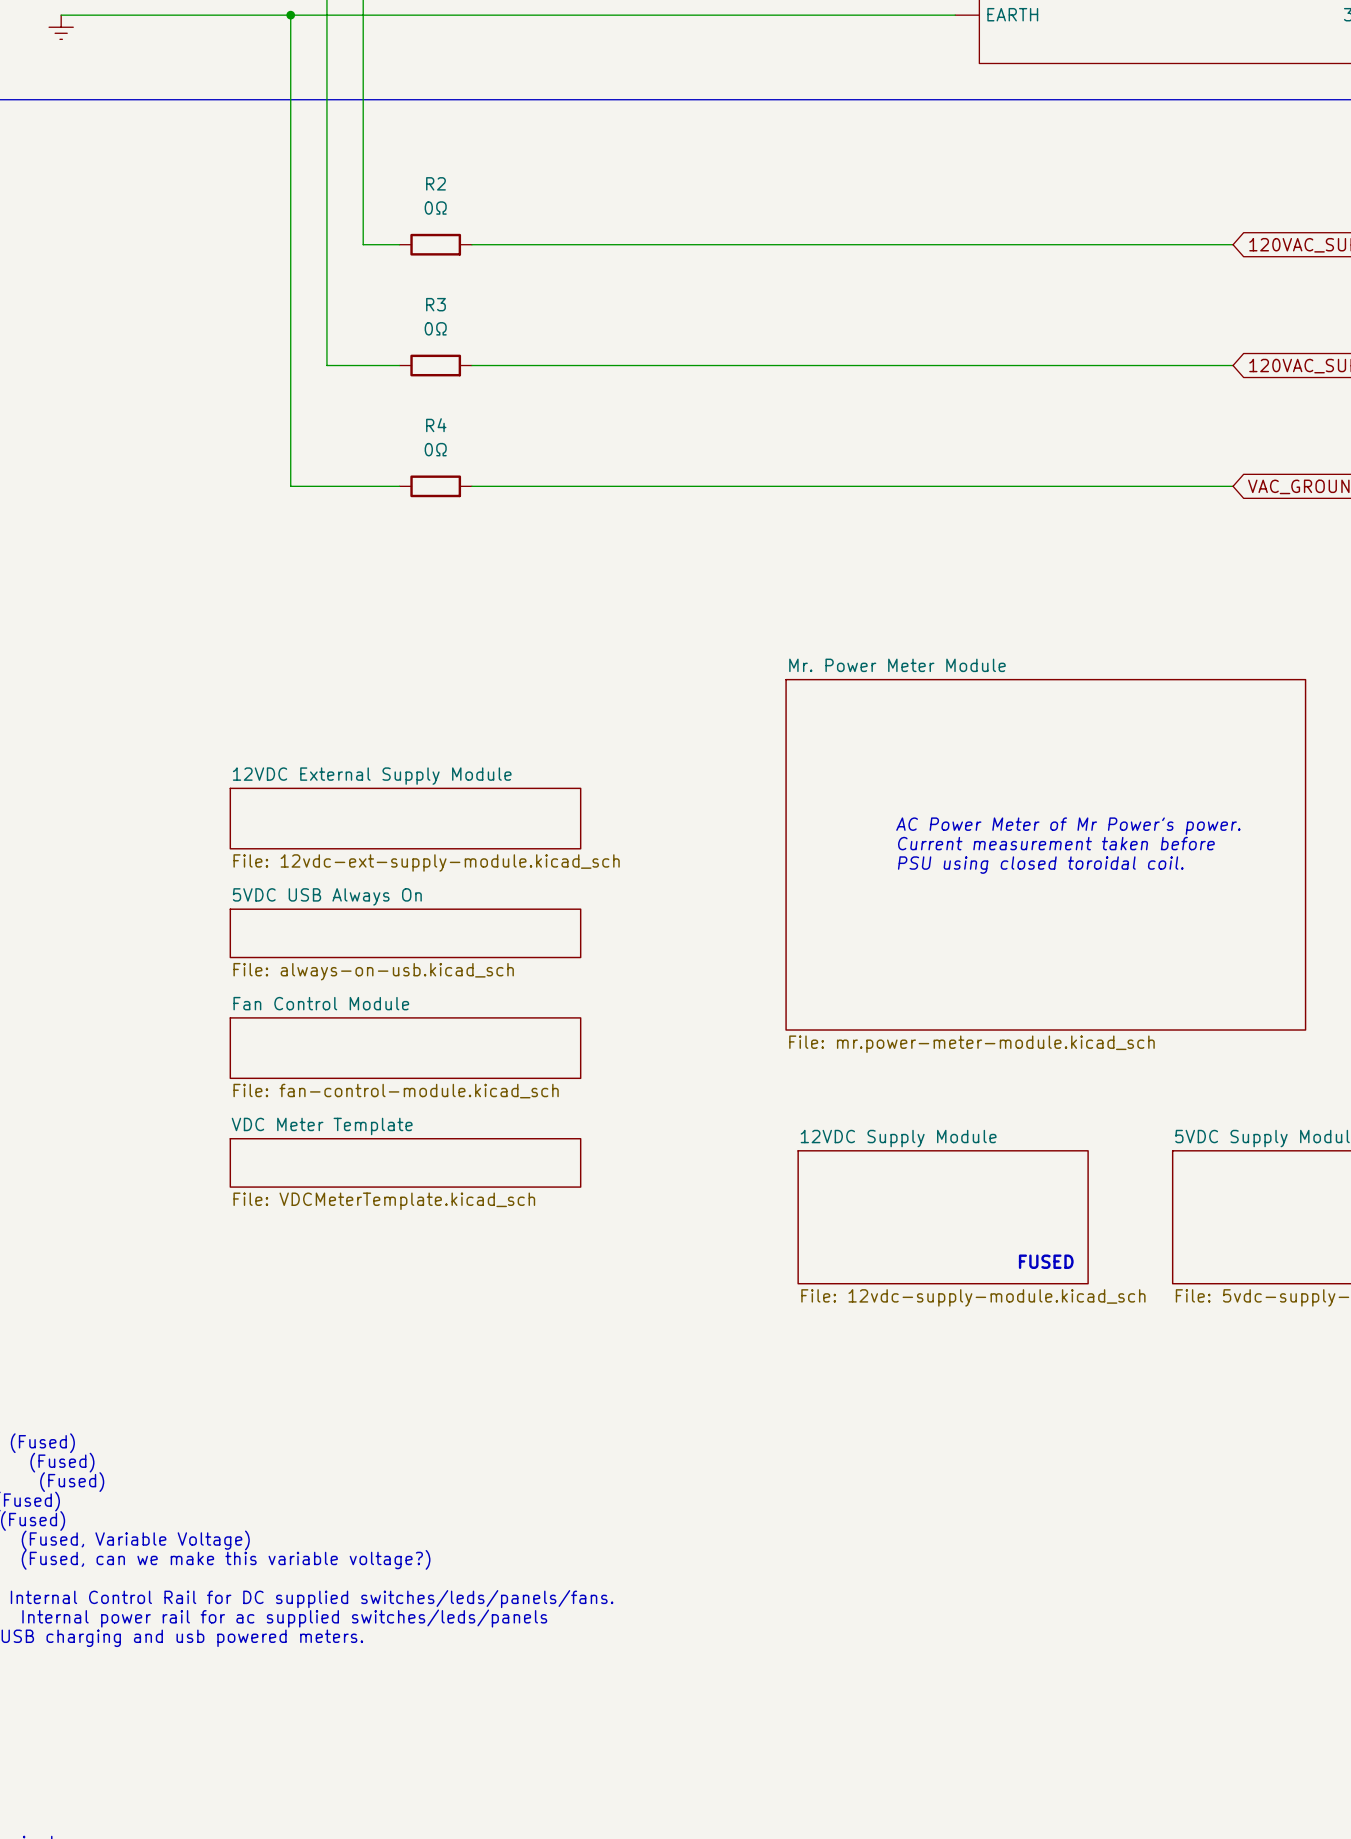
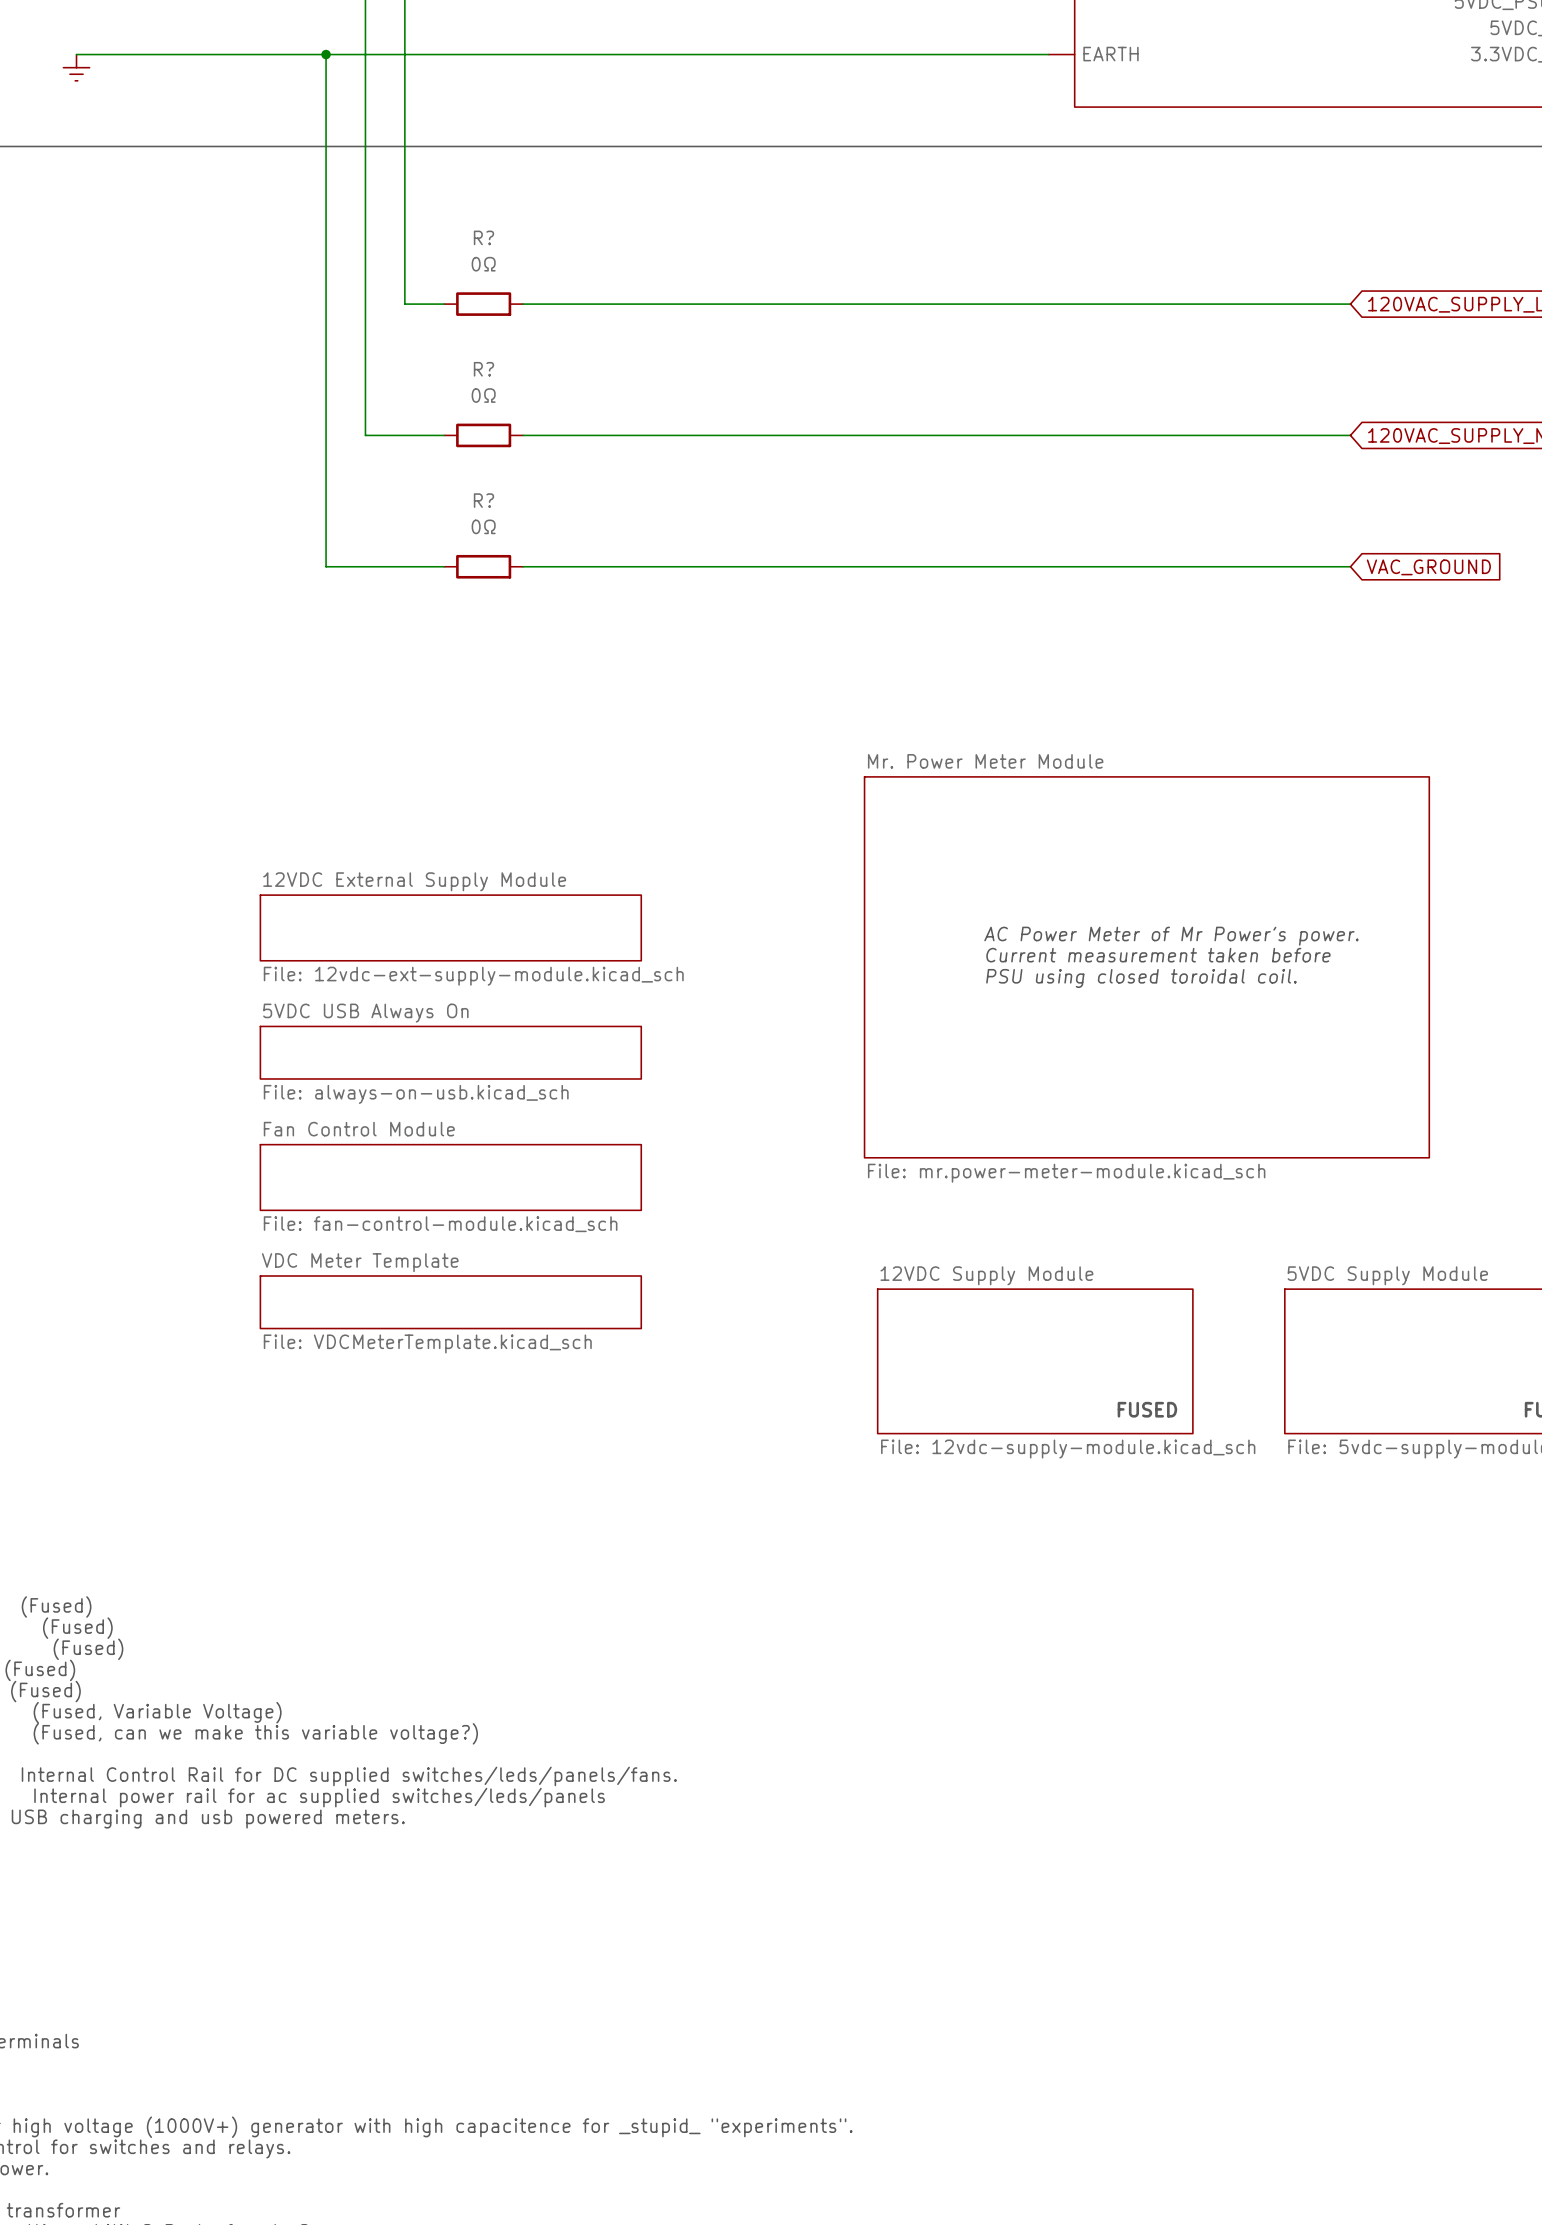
R2 name: R2 (435, 183) -> R? (483, 237)
R3 name: R3 (435, 304) -> R? (483, 369)
R4 name: R4 (436, 425) -> R? (483, 500)

